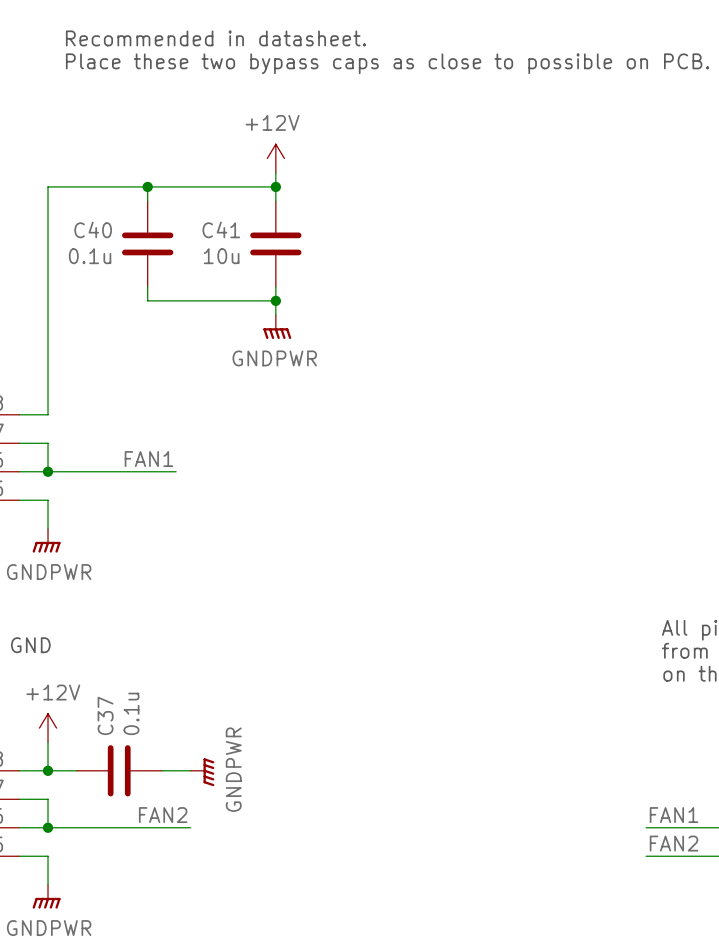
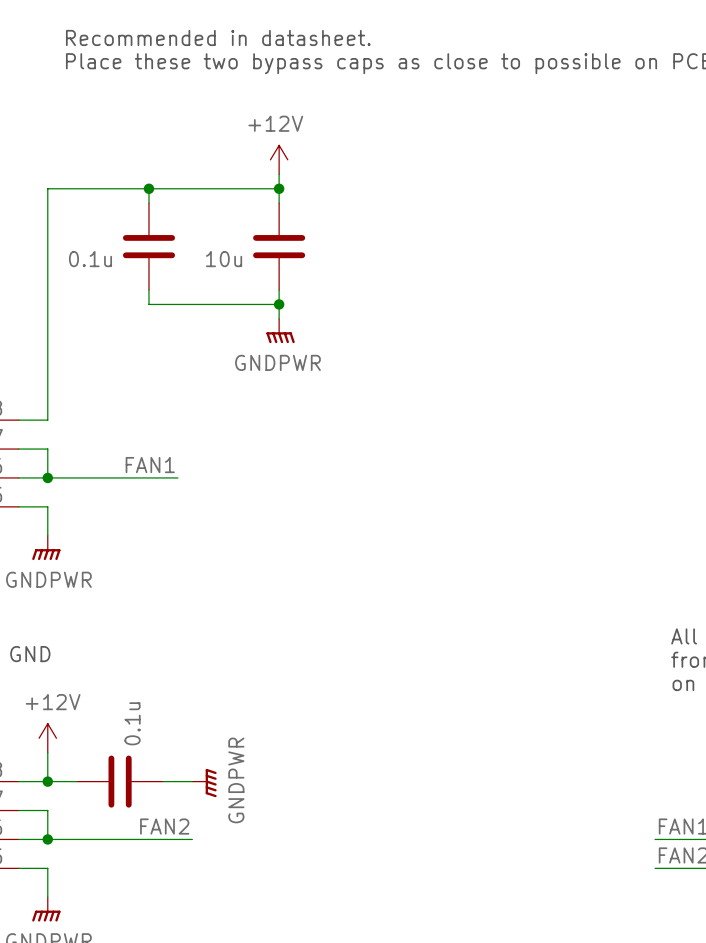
C40 name: C40 (93, 229) -> none
C41 name: C41 (221, 229) -> none
C37 name: C37 (105, 715) -> none

